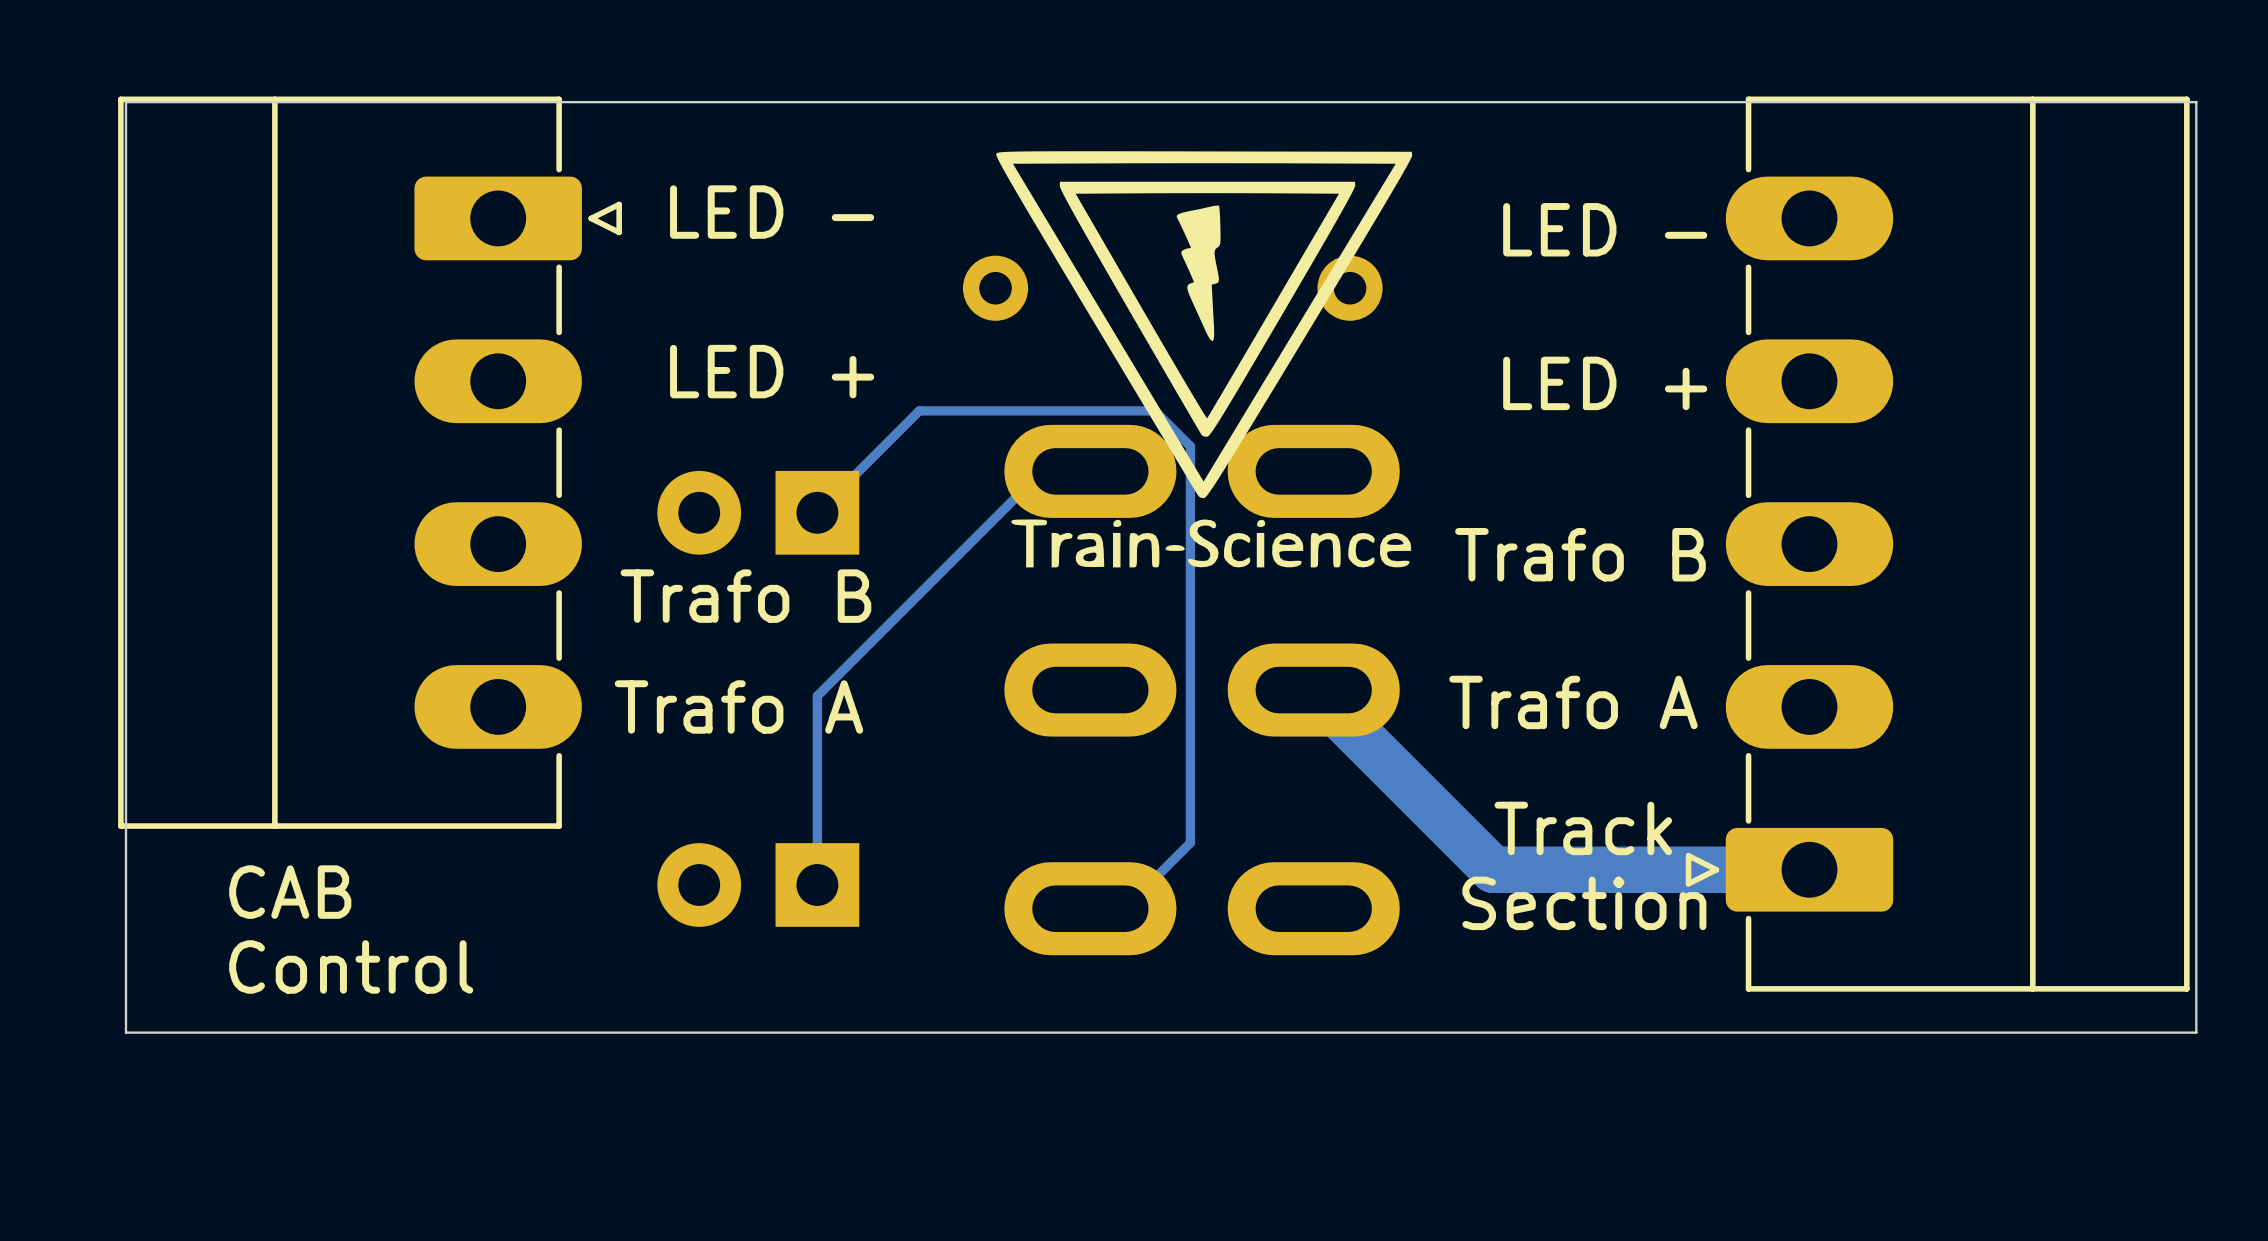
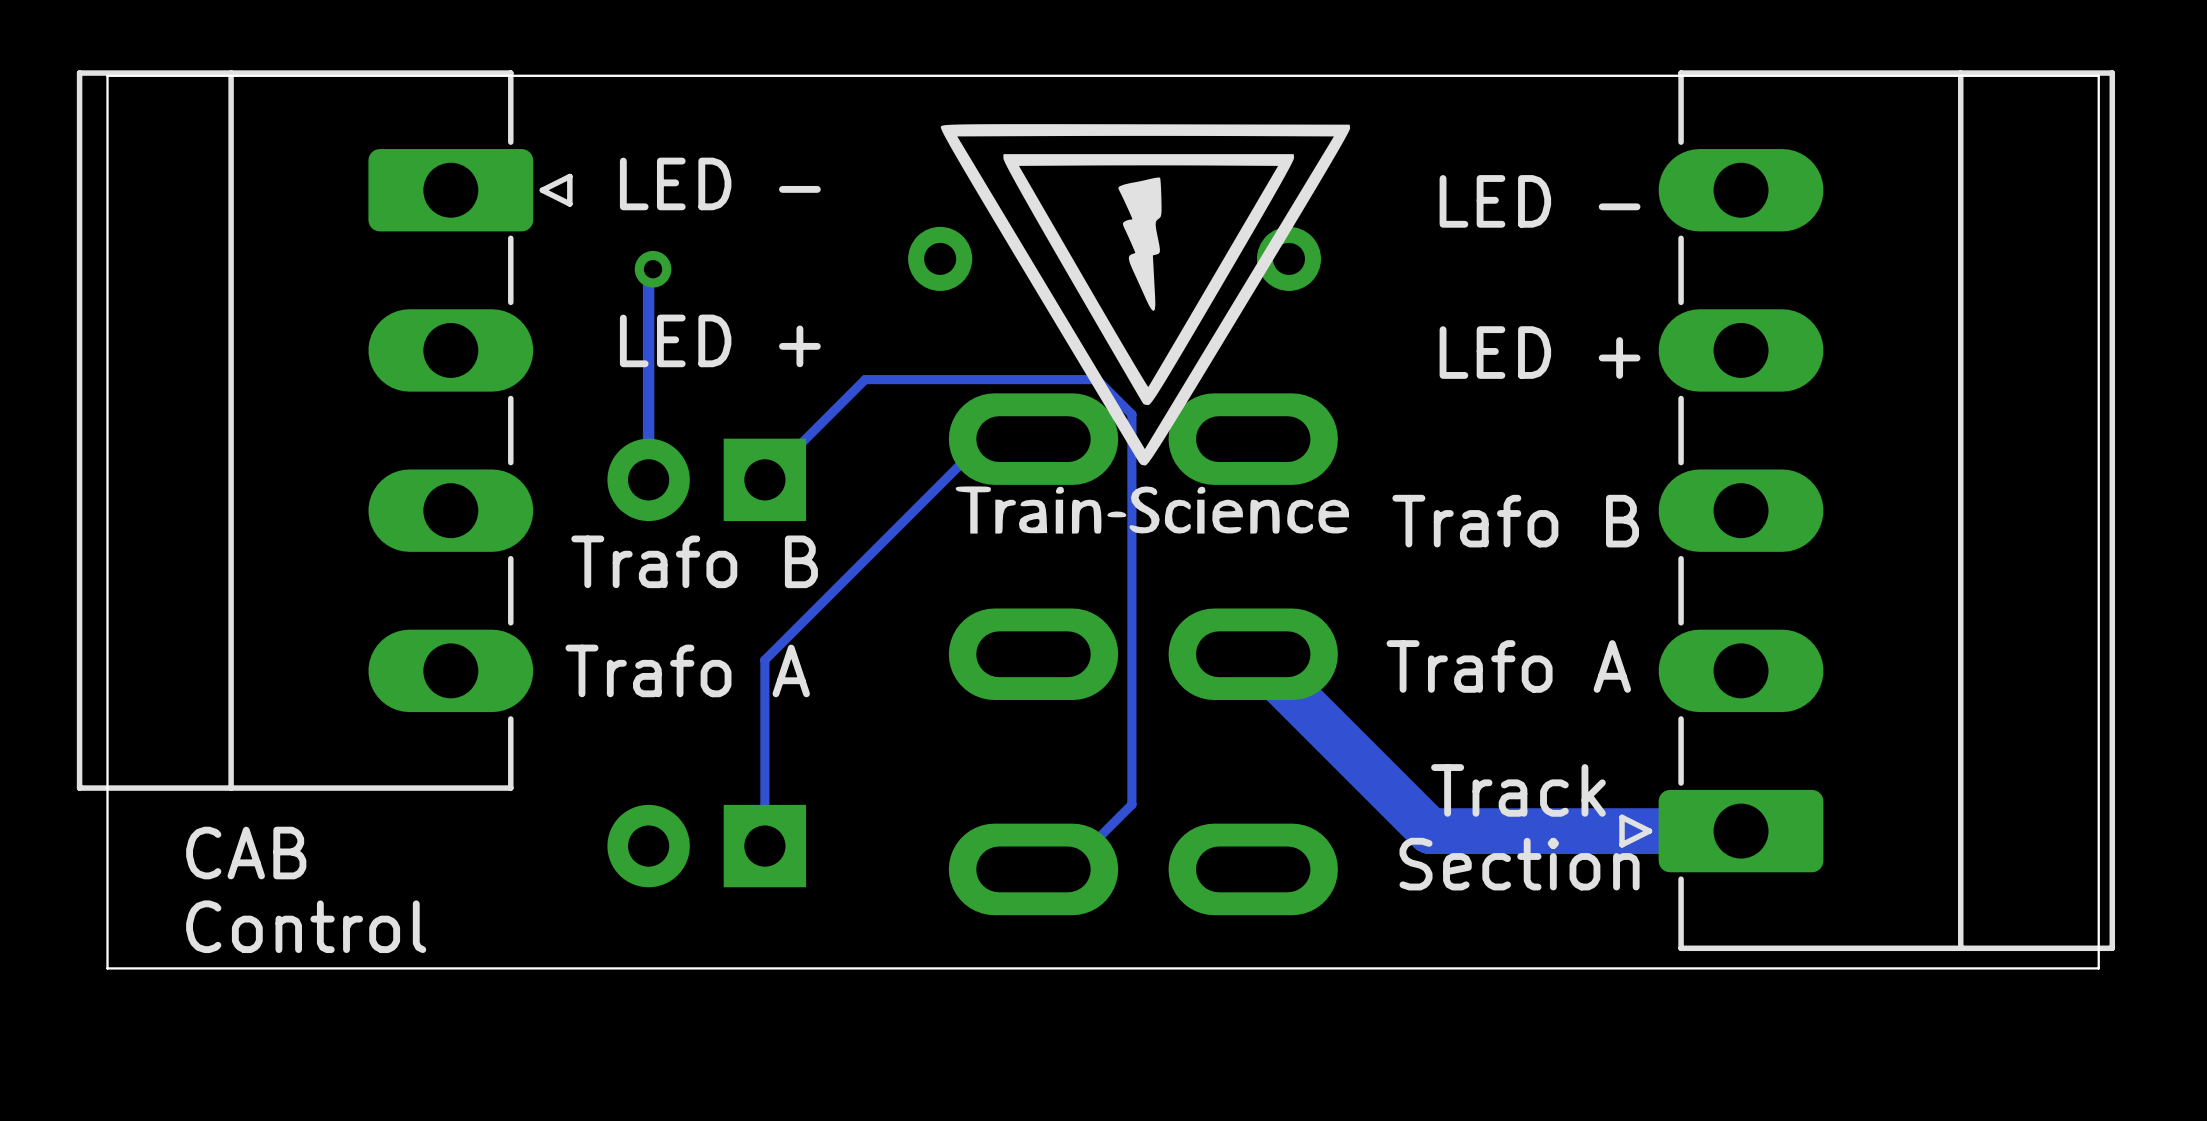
board edge: (2173, 102) (2196, 102) (2196, 1032) (126, 1032) (126, 102) (149, 102) -> (2098, 75) (2098, 968) (107, 968) (107, 75)
track: none -> (653, 269) (648, 273) (648, 479)
via: none -> (653, 269)

